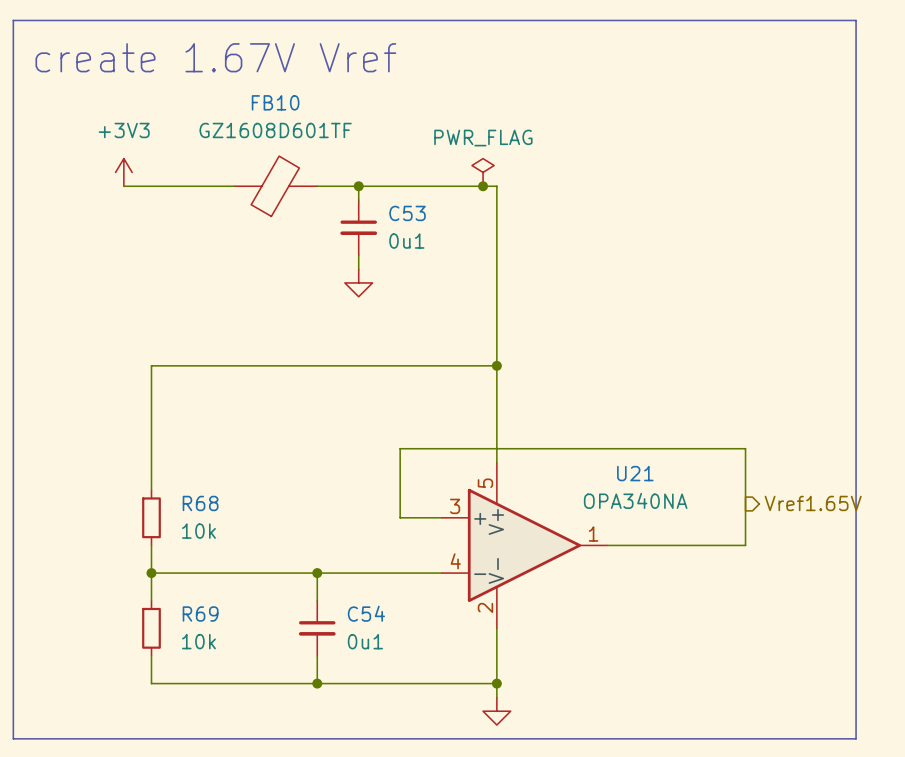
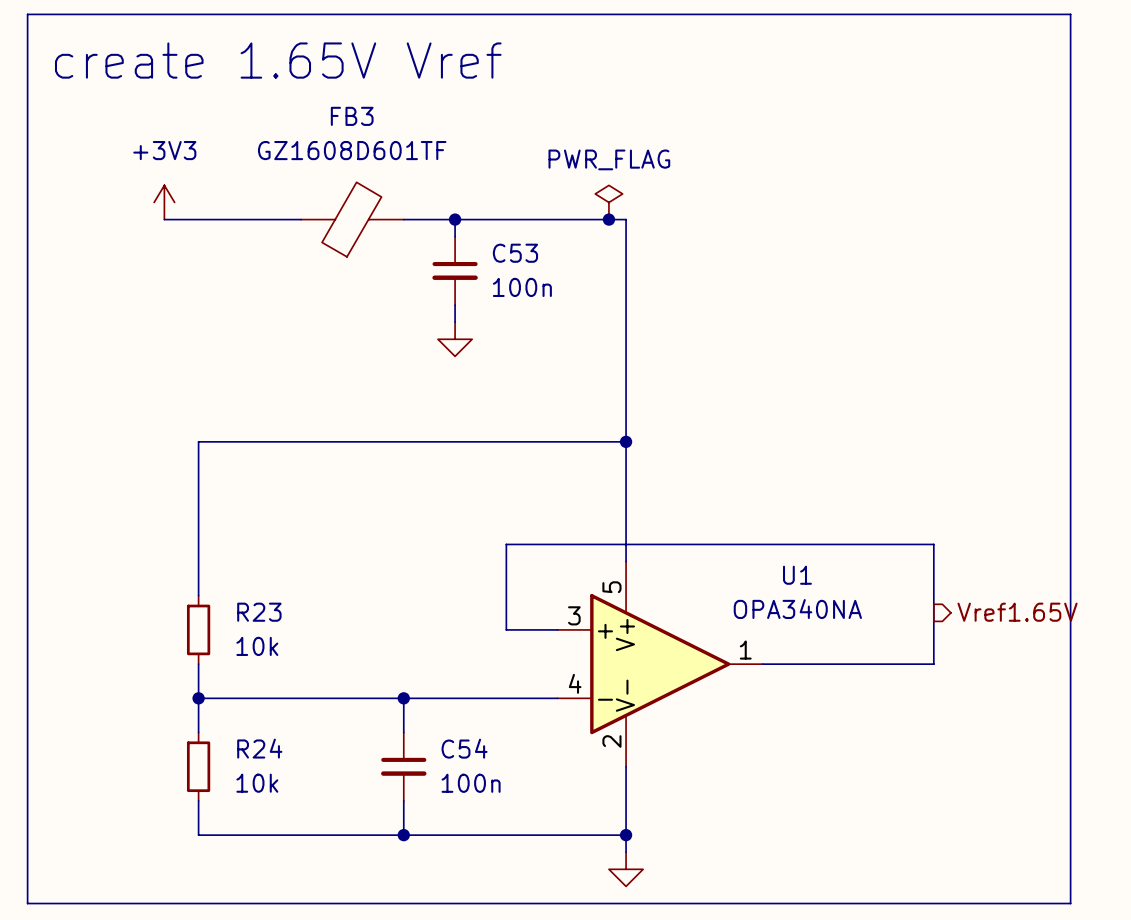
text: create 1.67V Vref (215, 57) -> create 1.65V Vref (278, 60)
FB10 name: FB10 (275, 102) -> FB3 (352, 116)
C53 value: 0u1 (406, 241) -> 100n (522, 287)
U21 name: U21 (635, 473) -> U1 (797, 575)
R68 name: R68 (200, 503) -> R23 (259, 612)
R69 name: R69 (200, 613) -> R24 (259, 748)
C54 value: 0u1 (365, 641) -> 100n (471, 783)

